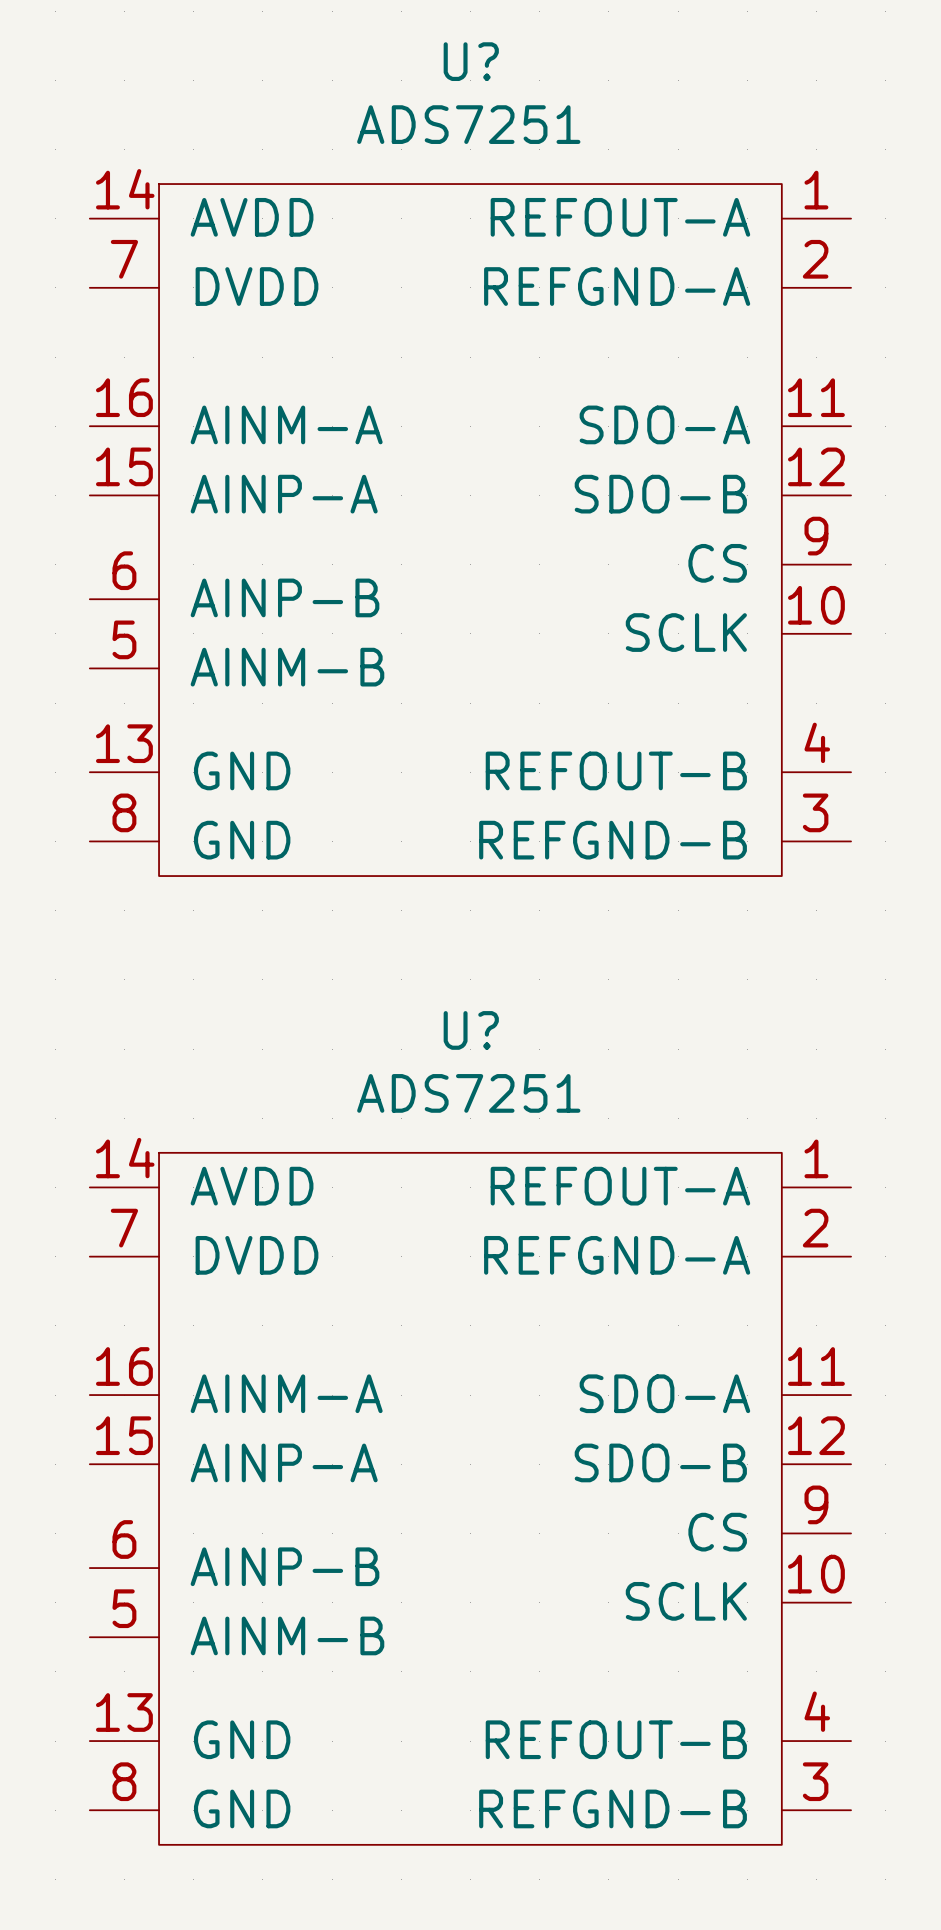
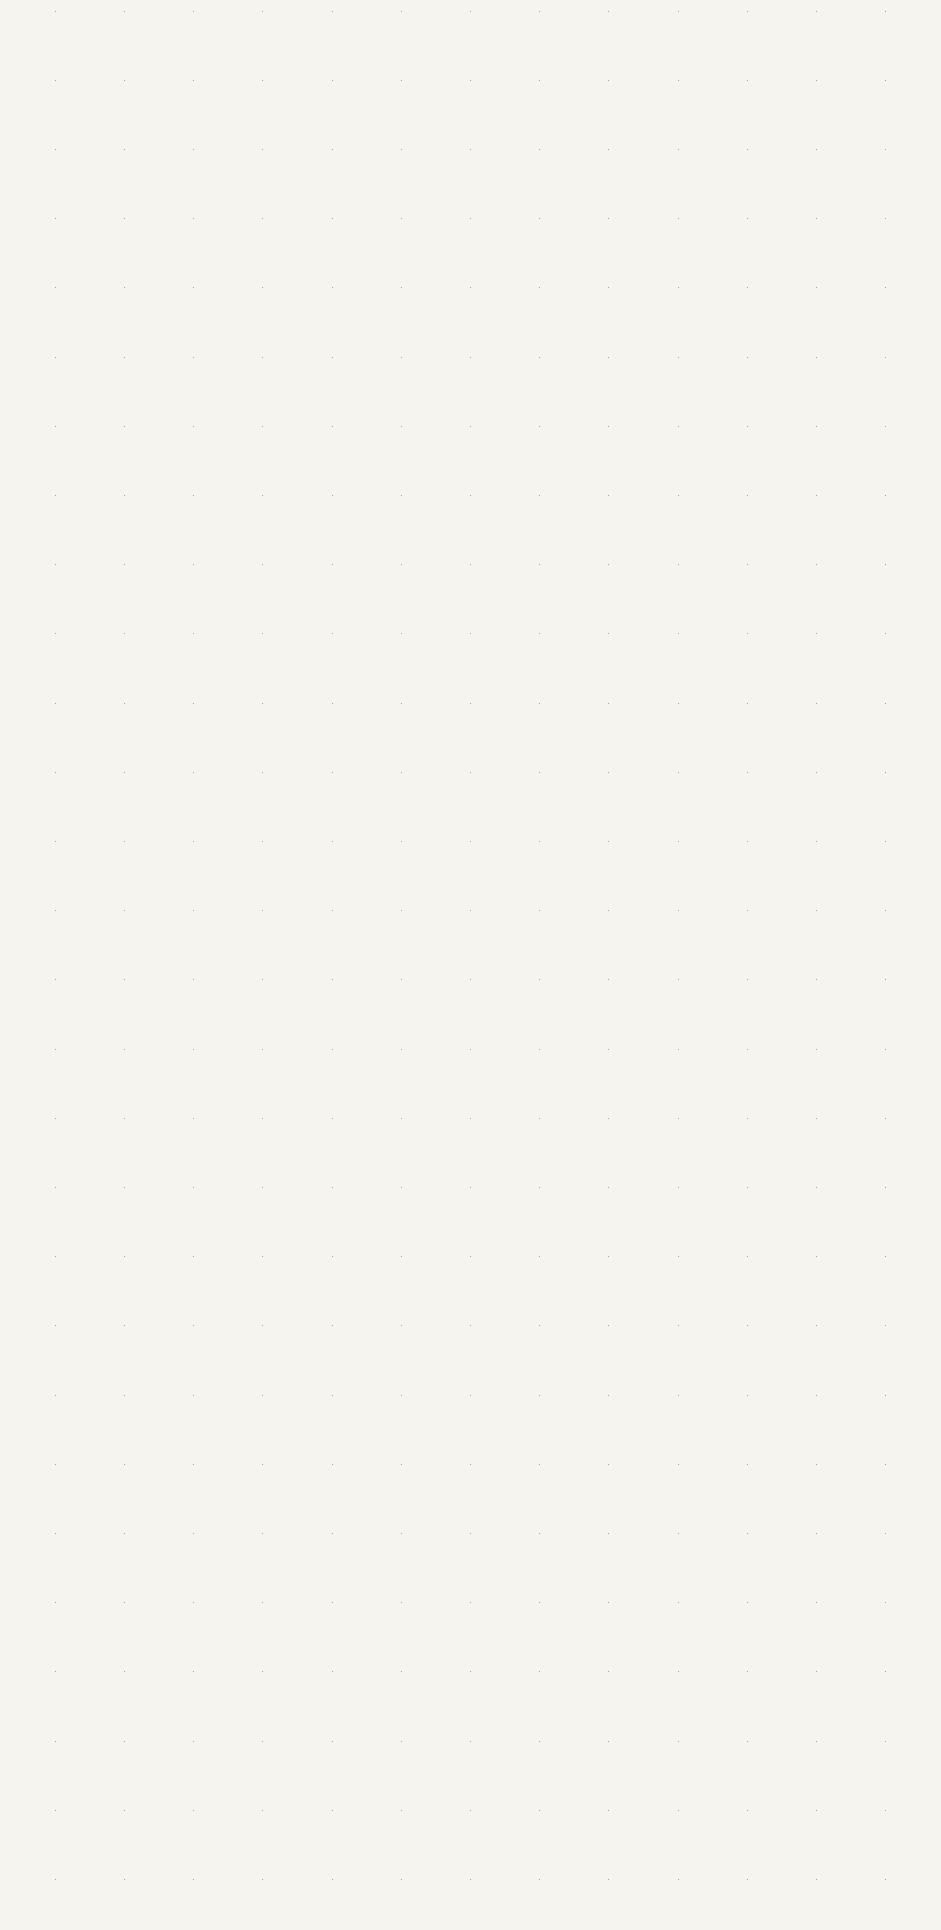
U?: ADS7251 (470, 530) -> none
U?: ADS7251 (470, 1498) -> none

